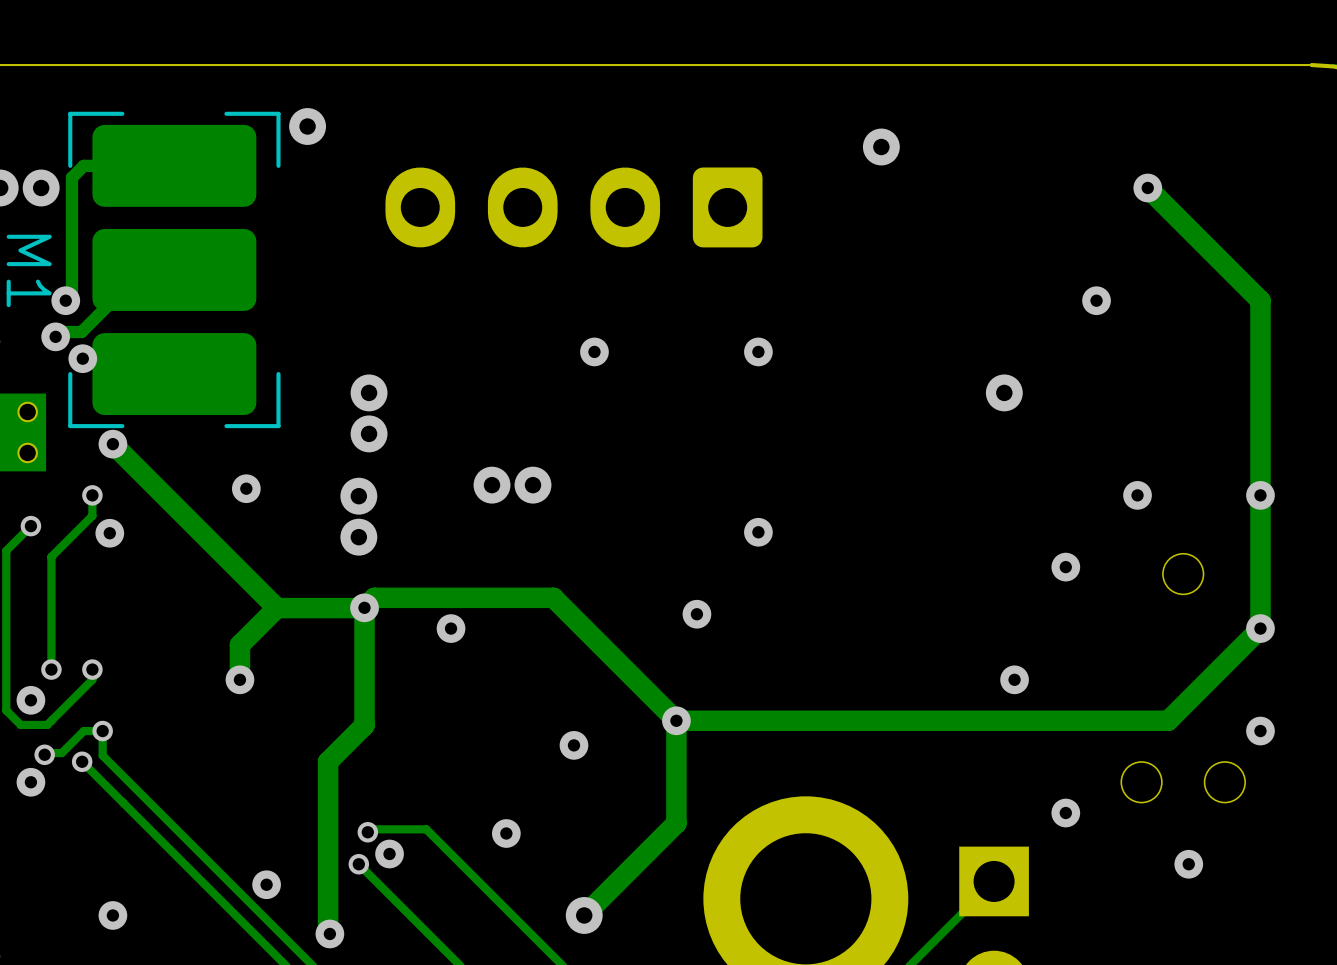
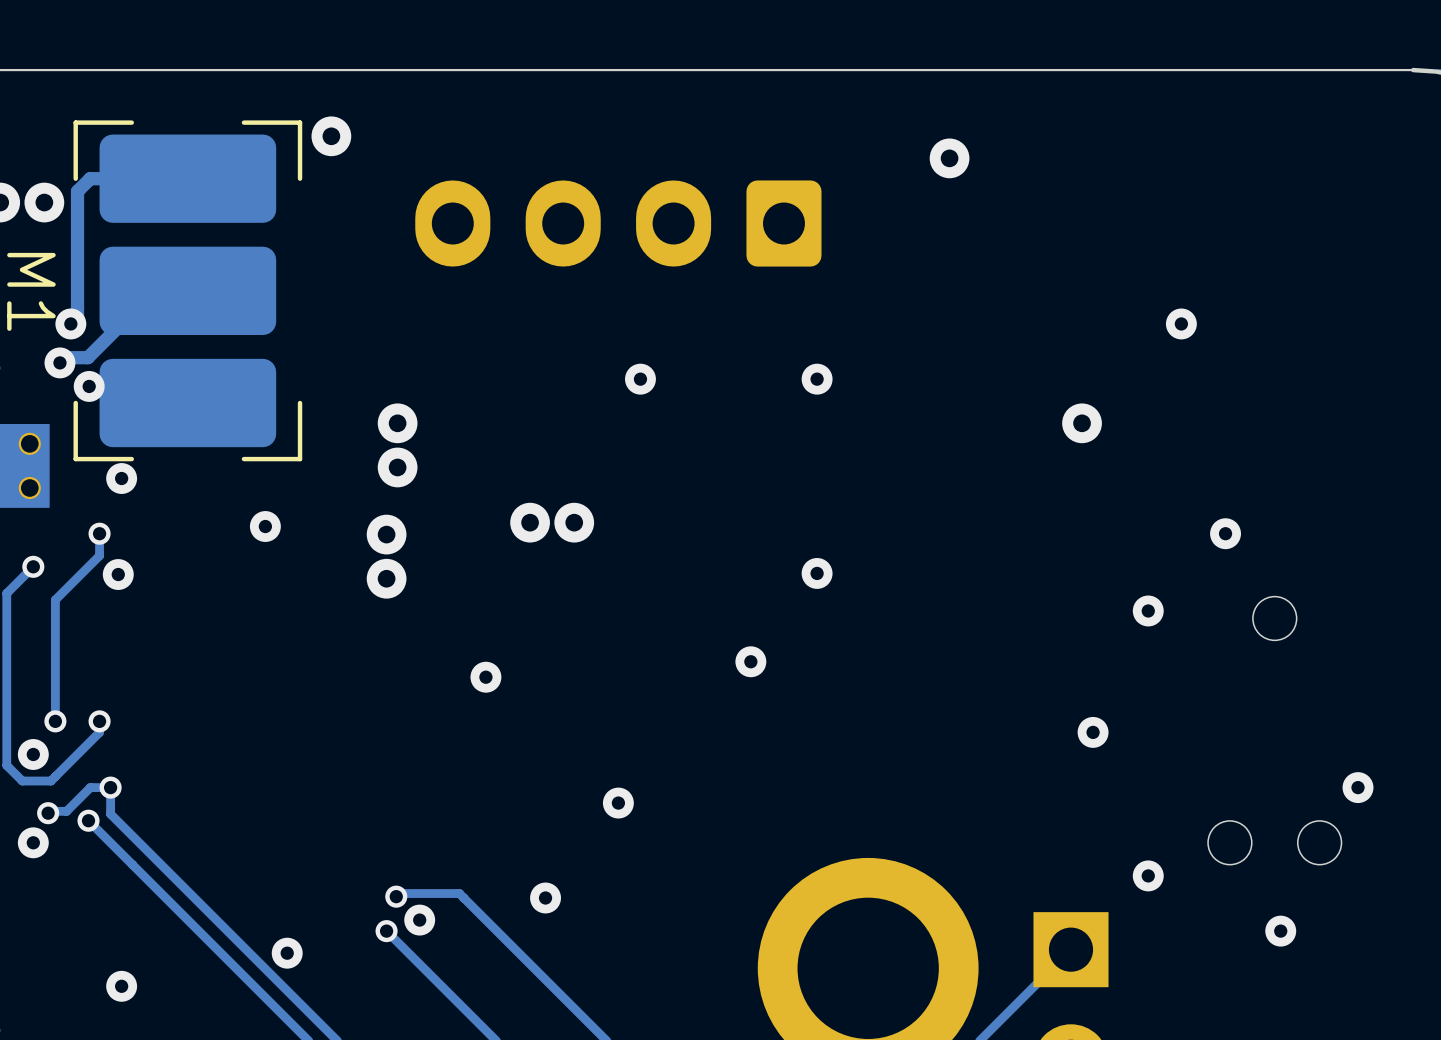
track: (1147, 187) (1260, 300) (1260, 628) (1168, 720) (676, 720) -> none
via: (1147, 187) -> none
track: (112, 444) (276, 608) -> none
via: (1260, 495) -> none
via: (364, 607) -> none
track: (276, 608) (239, 644) (239, 679) -> none
track: (369, 608) (276, 608) -> none
via: (1260, 628) -> none
via: (239, 679) -> none
track: (676, 720) (676, 823) (584, 915) -> none
track: (676, 720) (553, 597) (374, 597) (364, 607) (364, 725) (328, 761) (328, 932) (329, 933) -> none
via: (676, 720) -> none
via: (584, 915) -> none
via: (329, 933) -> none

